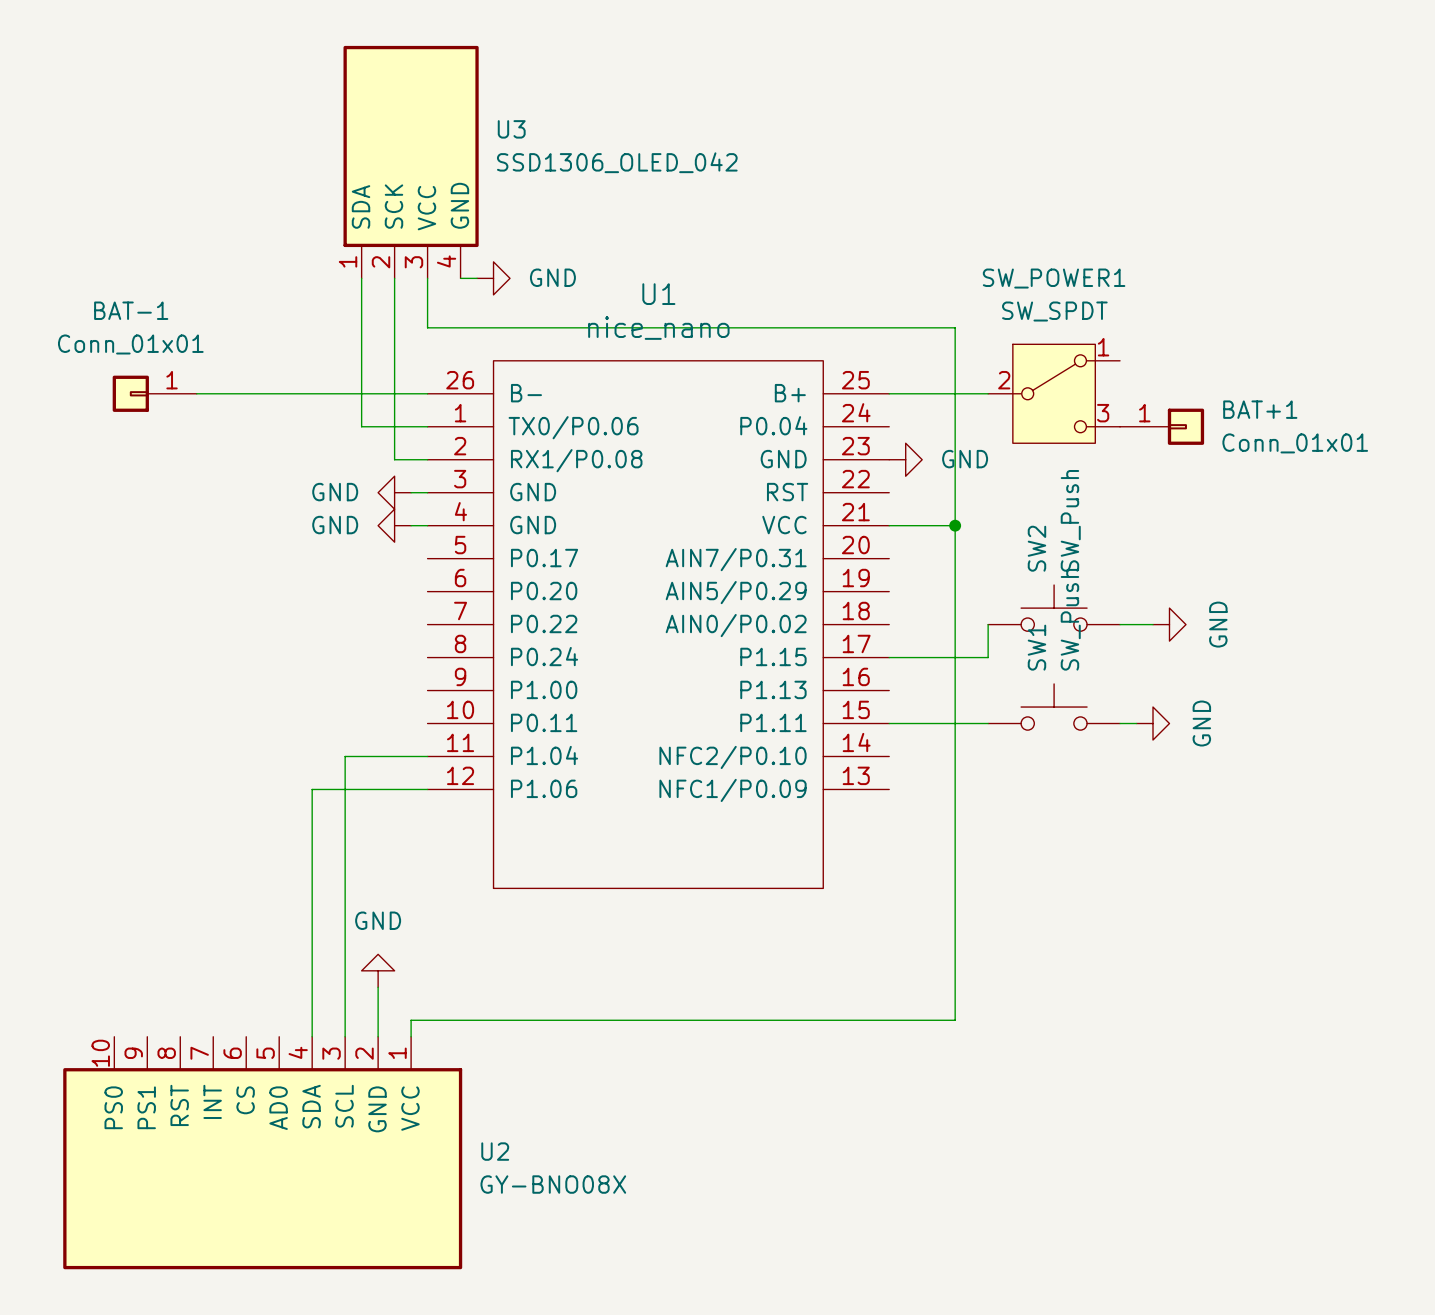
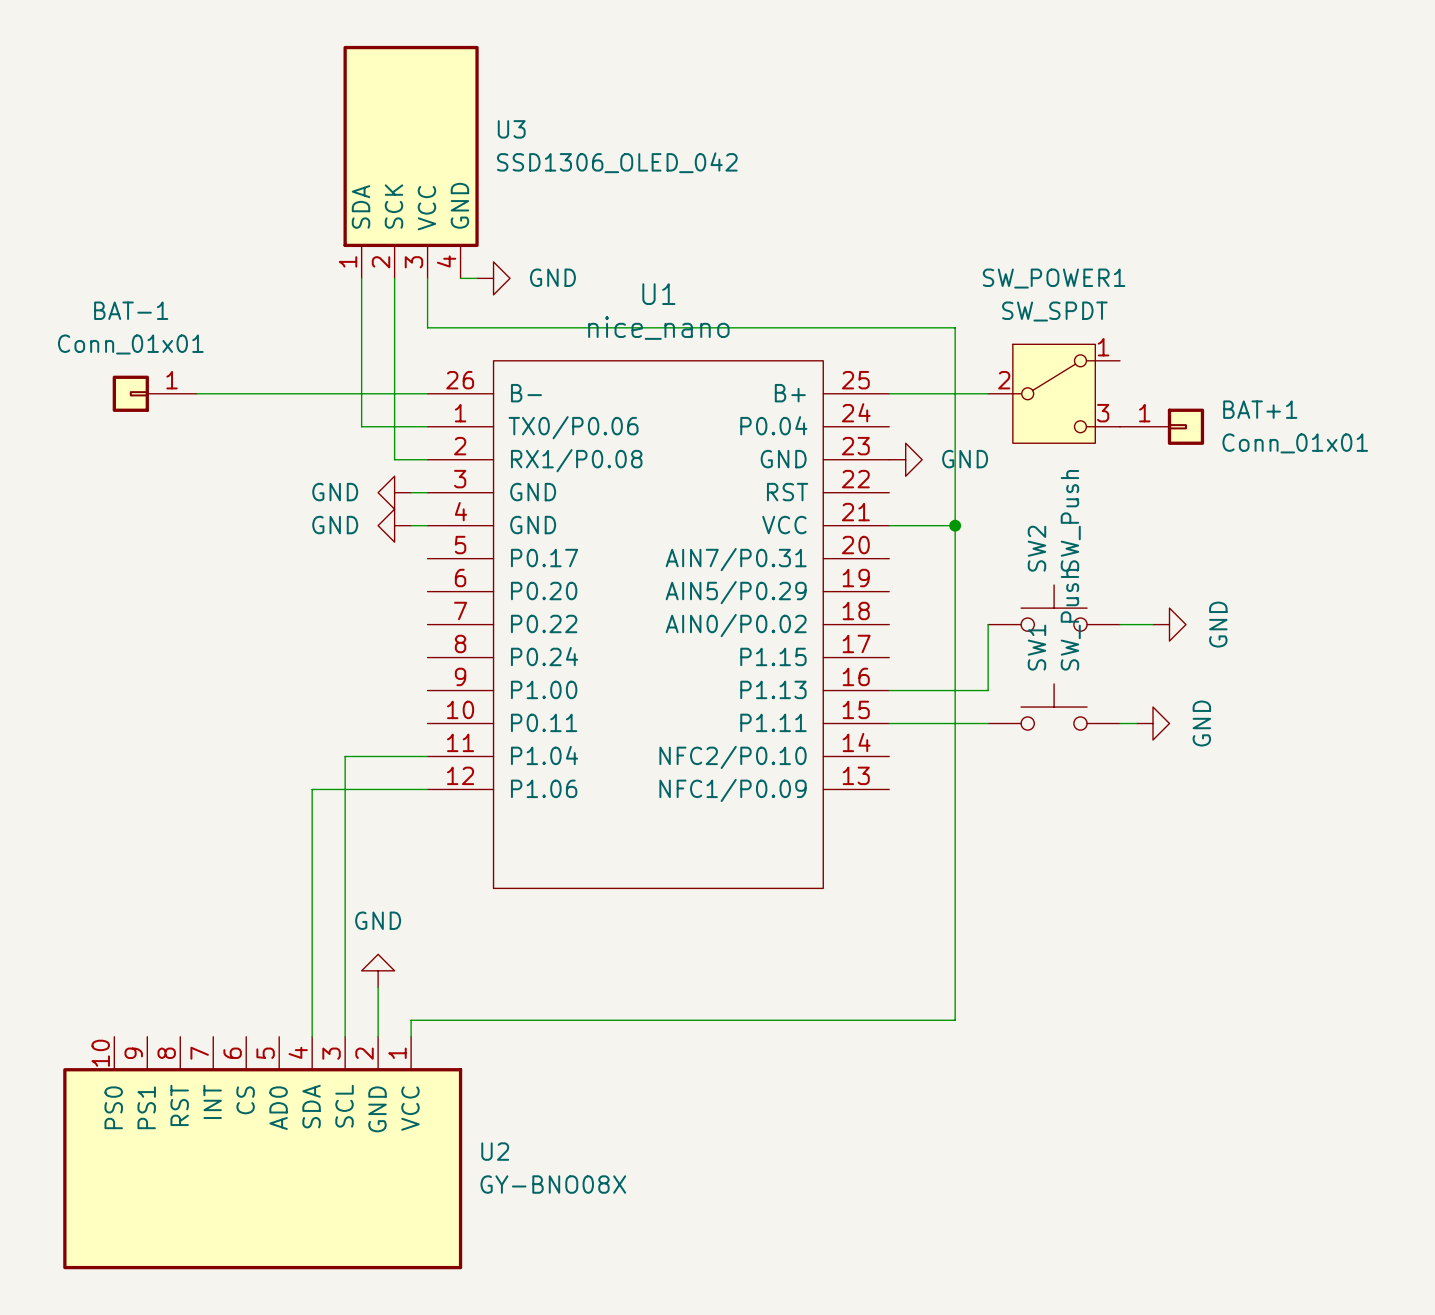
wire: (889, 657) (988, 657) -> (889, 690) (988, 690) (988, 657)

